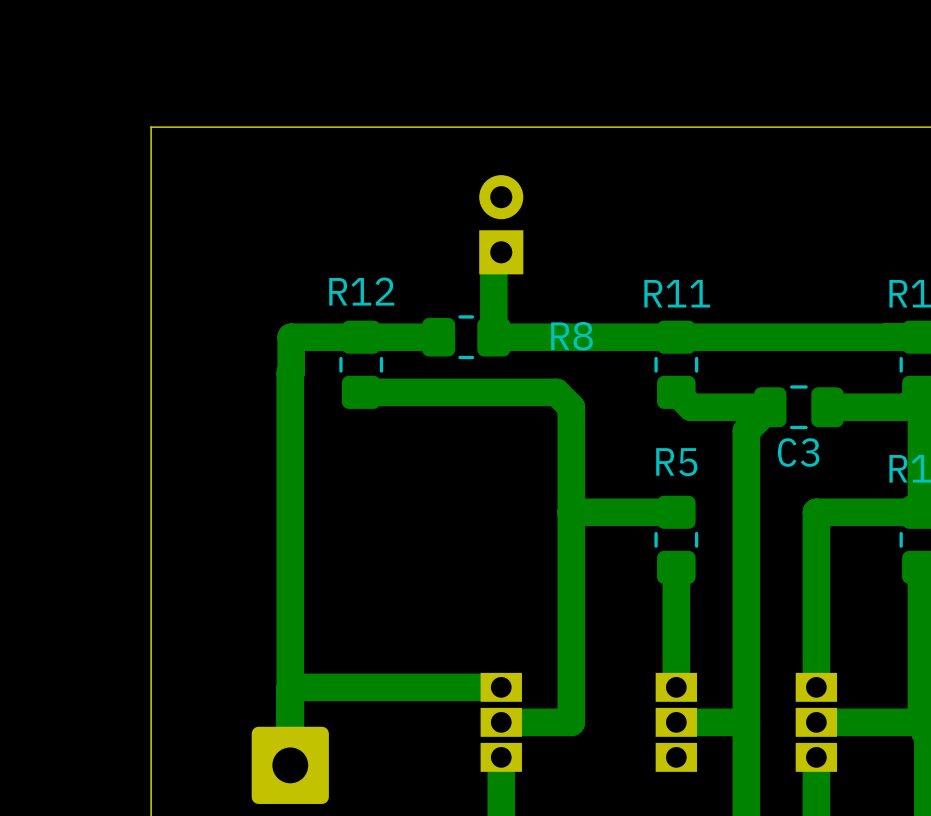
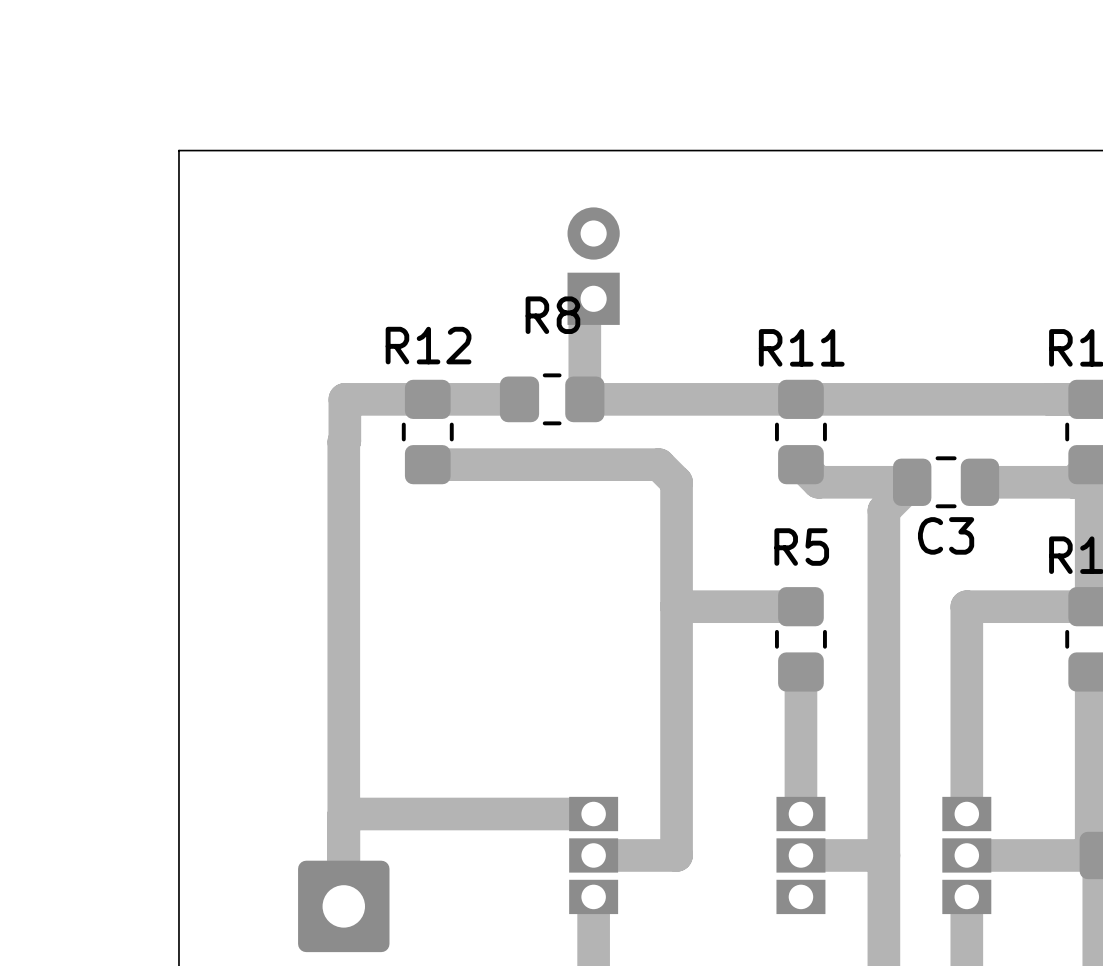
R8 name position: R8 (571, 336) -> R8 (552, 315)

